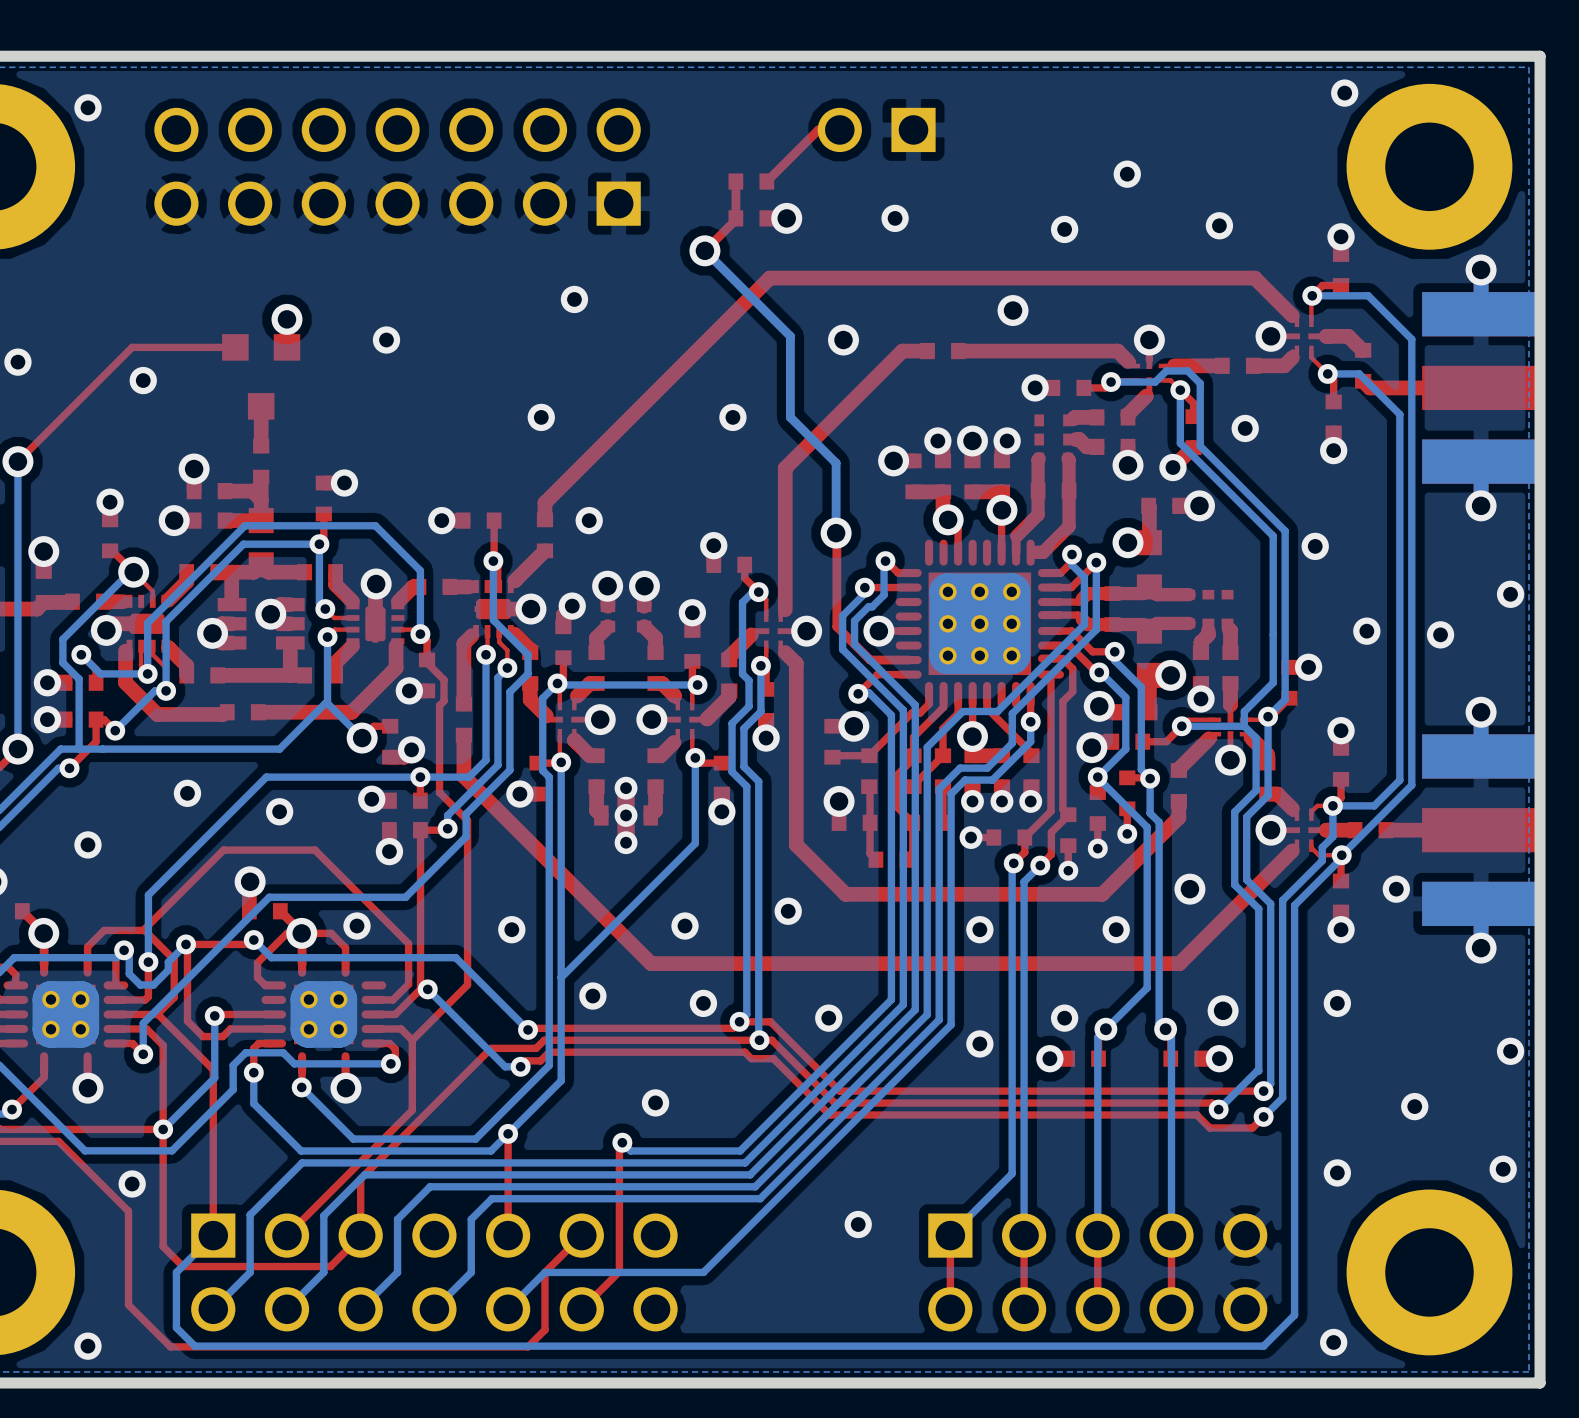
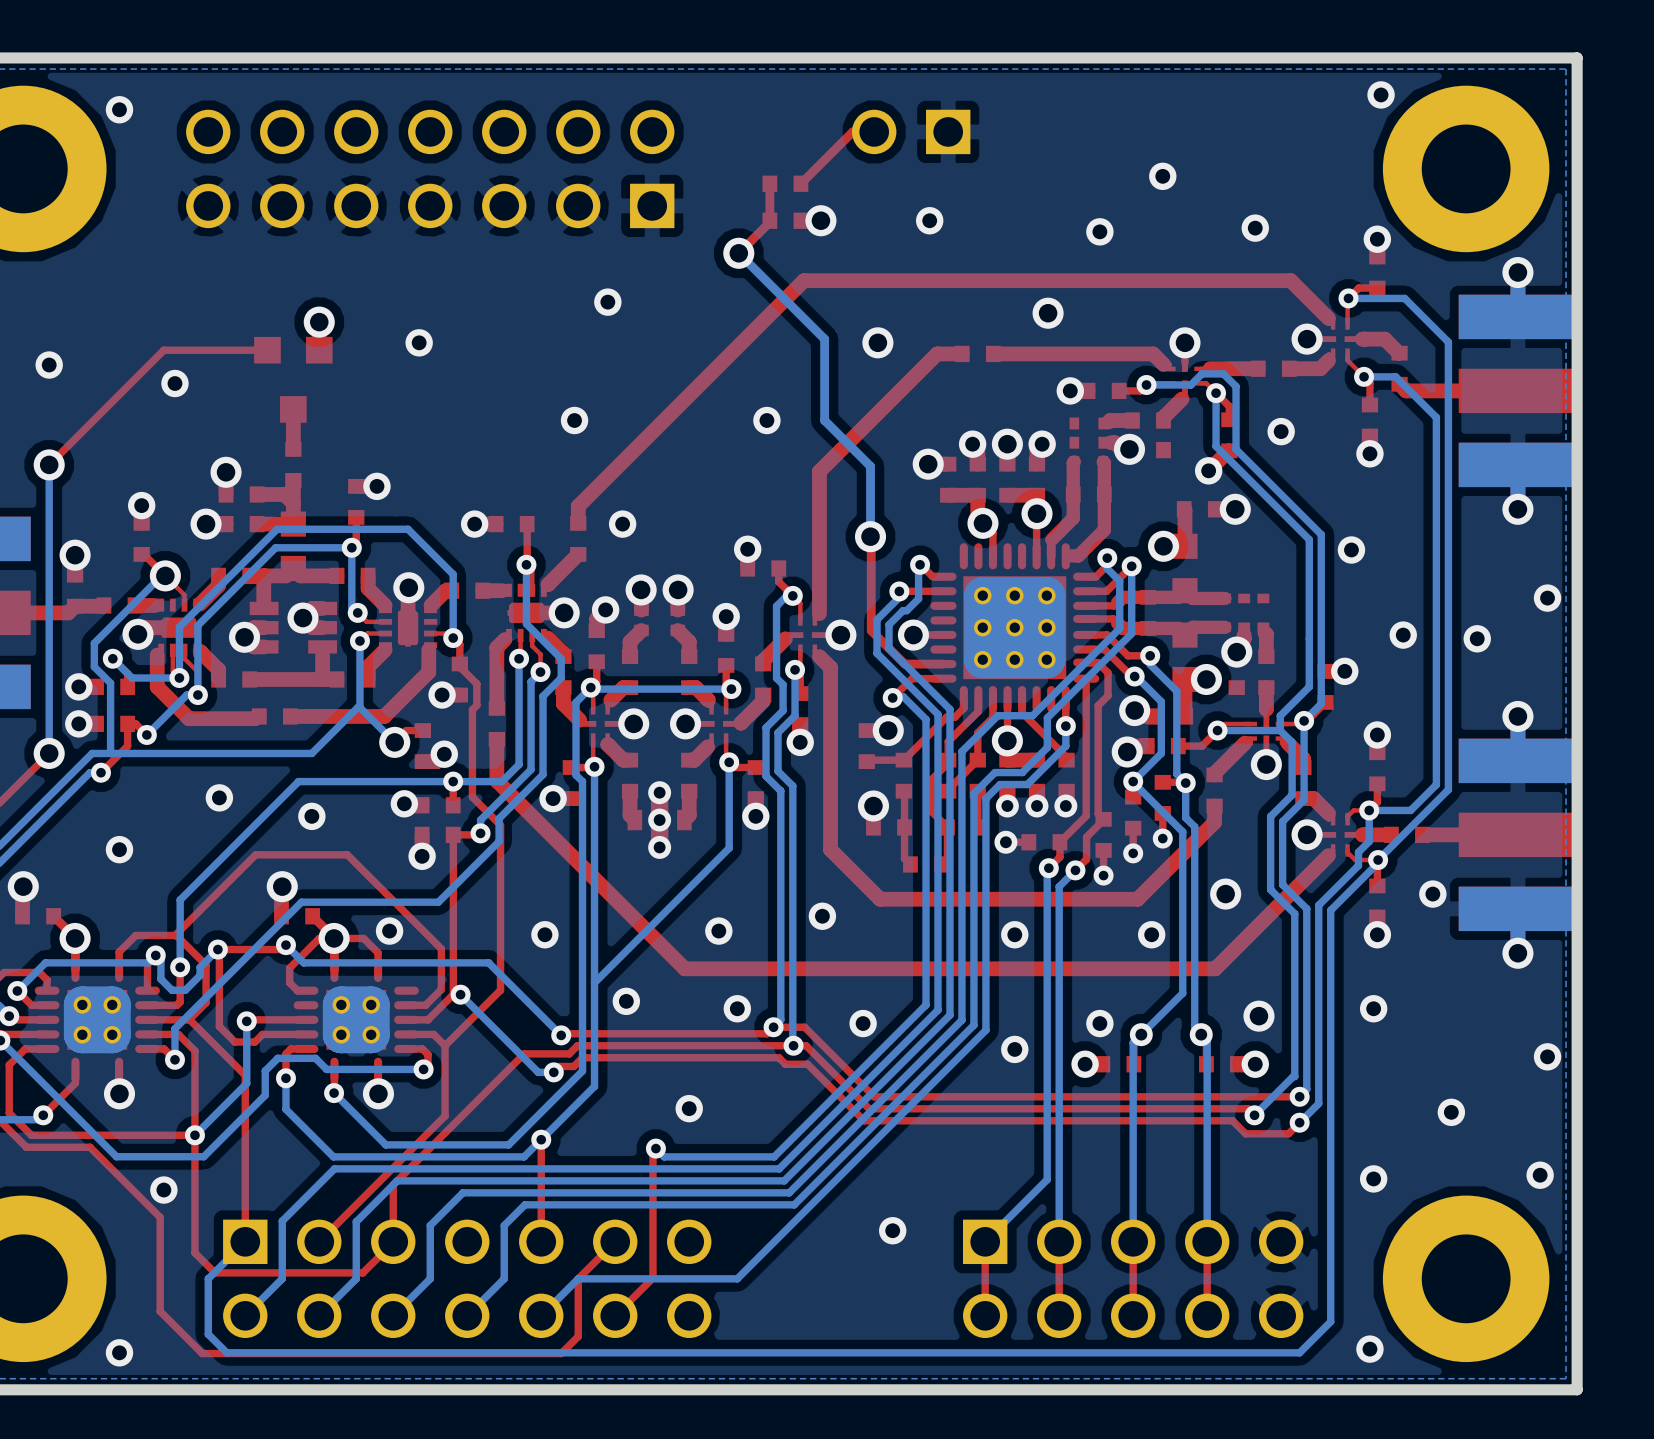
via position: (1128, 465) -> (1129, 449)
via: none -> (1236, 652)
via: (1200, 698) -> none

